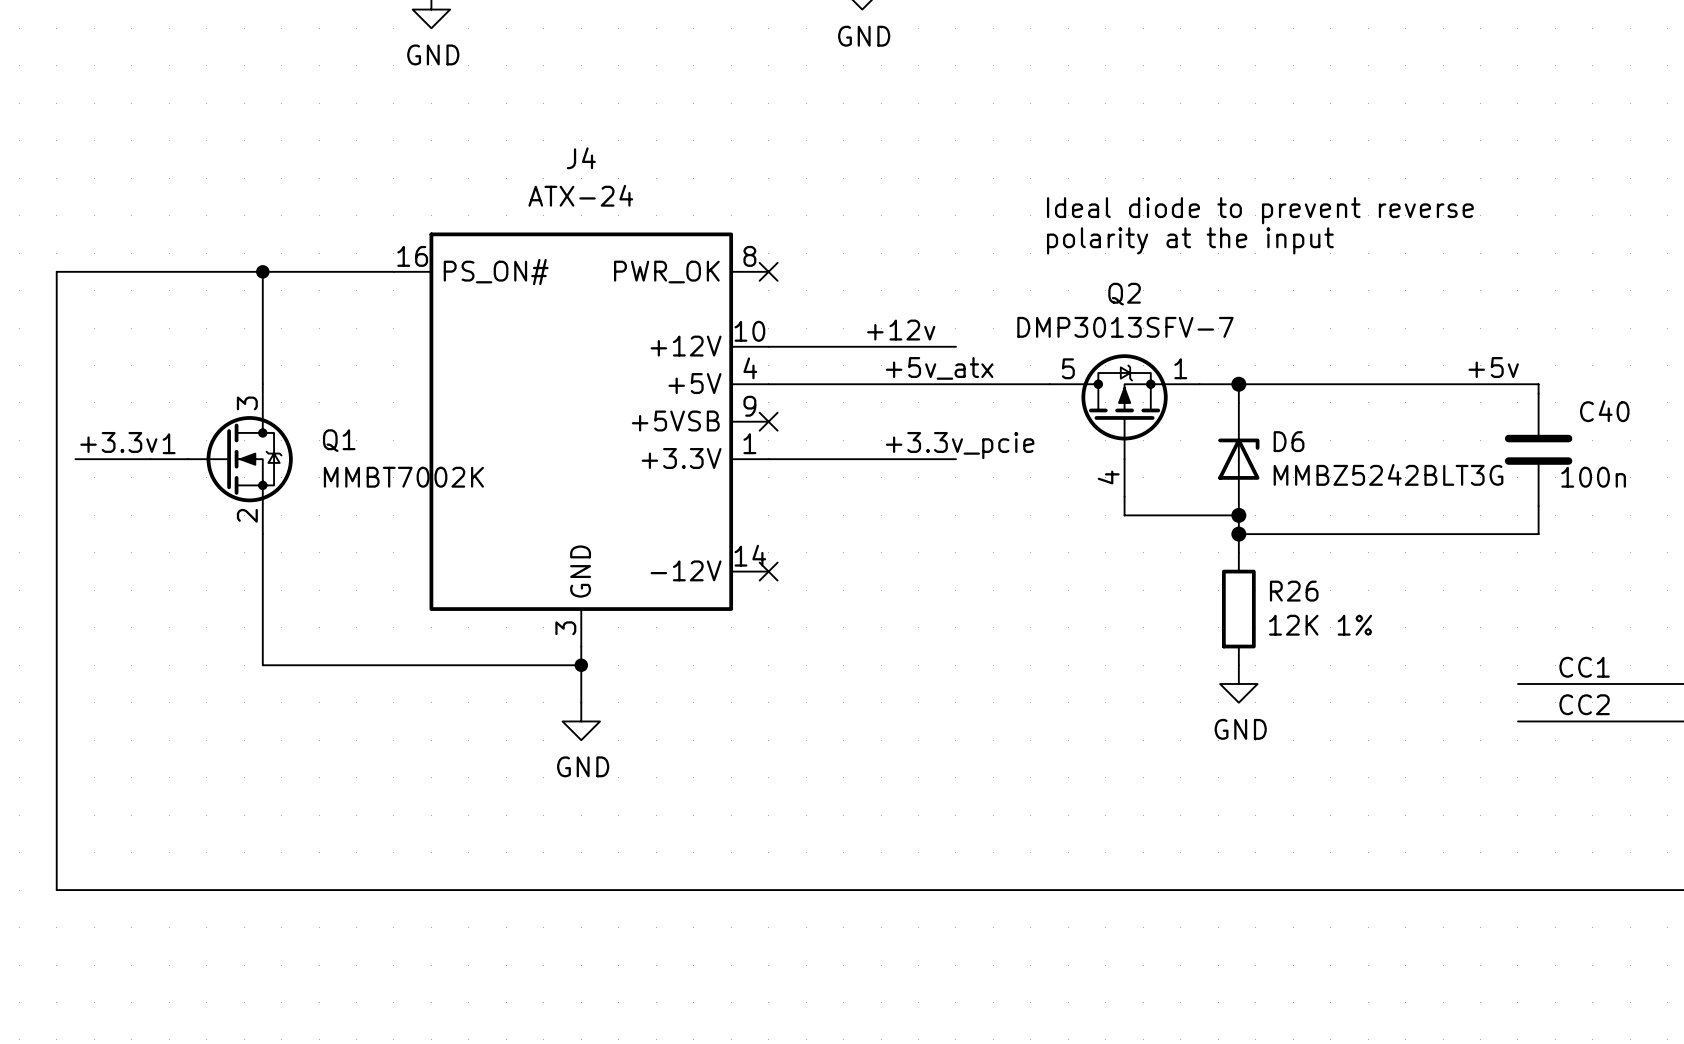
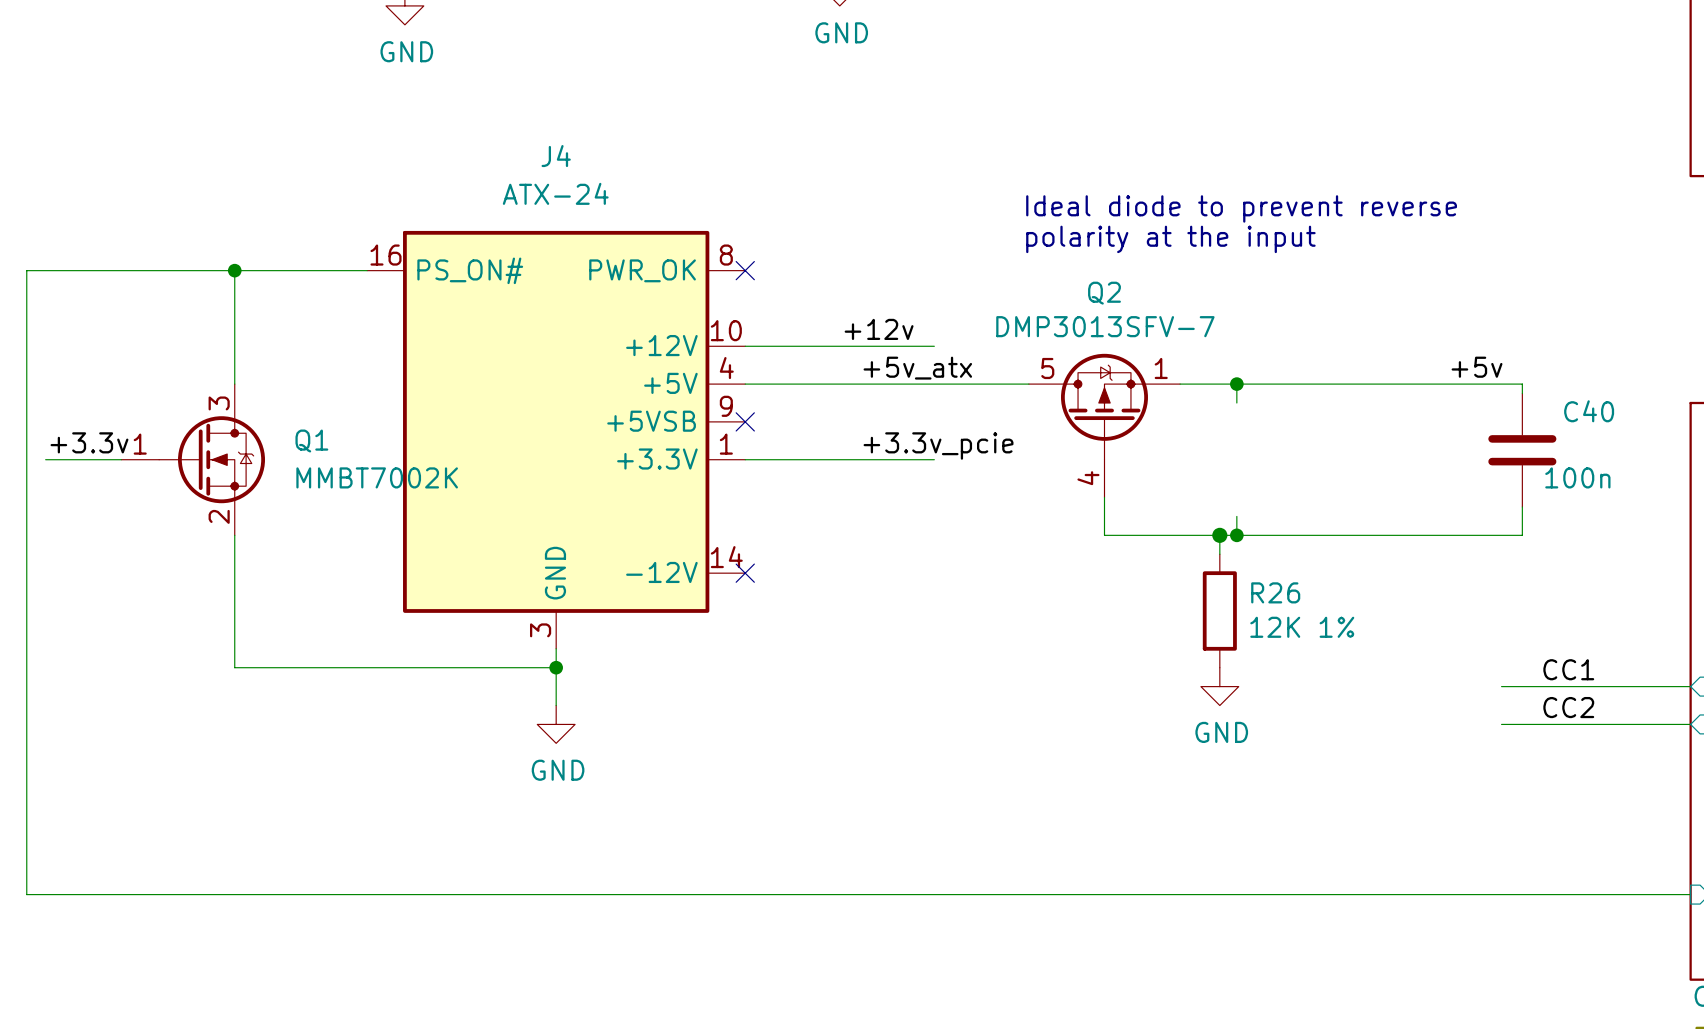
wire: (1238, 384) (1238, 402) -> (1236, 384) (1236, 402)
junction: (1238, 384) -> none
junction: none -> (1236, 384)
D6: MMBZ5242BLT3G (1238, 459) -> none
wire: (1124, 515) (1238, 515) (1238, 534) -> (1104, 516) (1104, 535) (1219, 535)
junction: (1238, 515) -> none
wire: none -> (1236, 516) (1236, 535)
junction: none -> (1236, 535)

